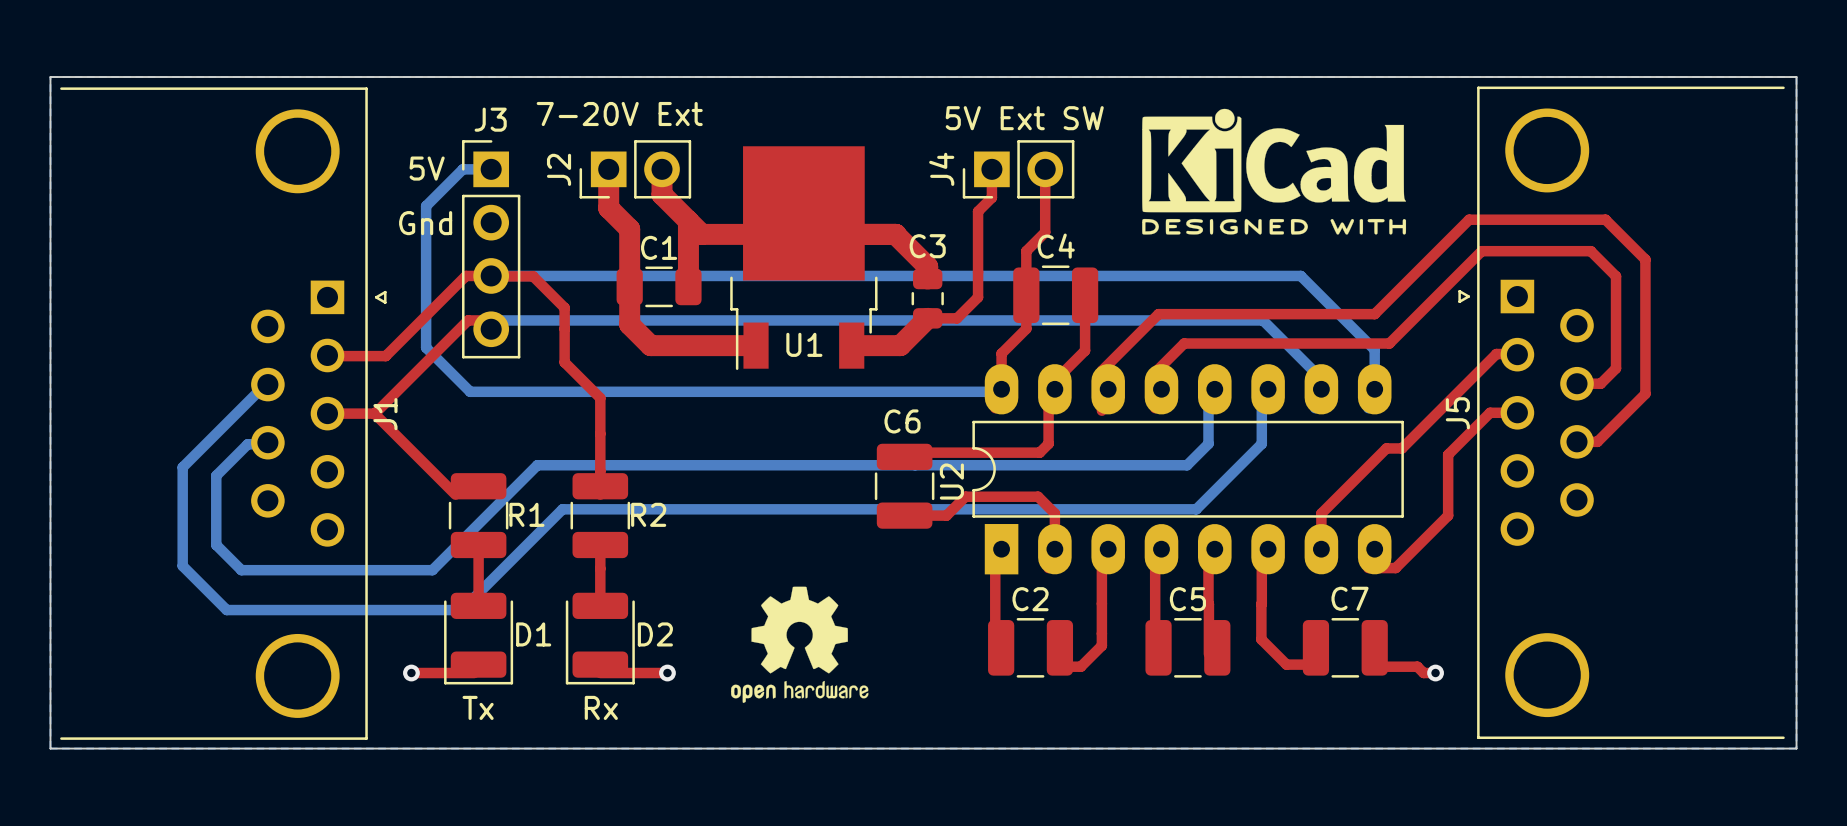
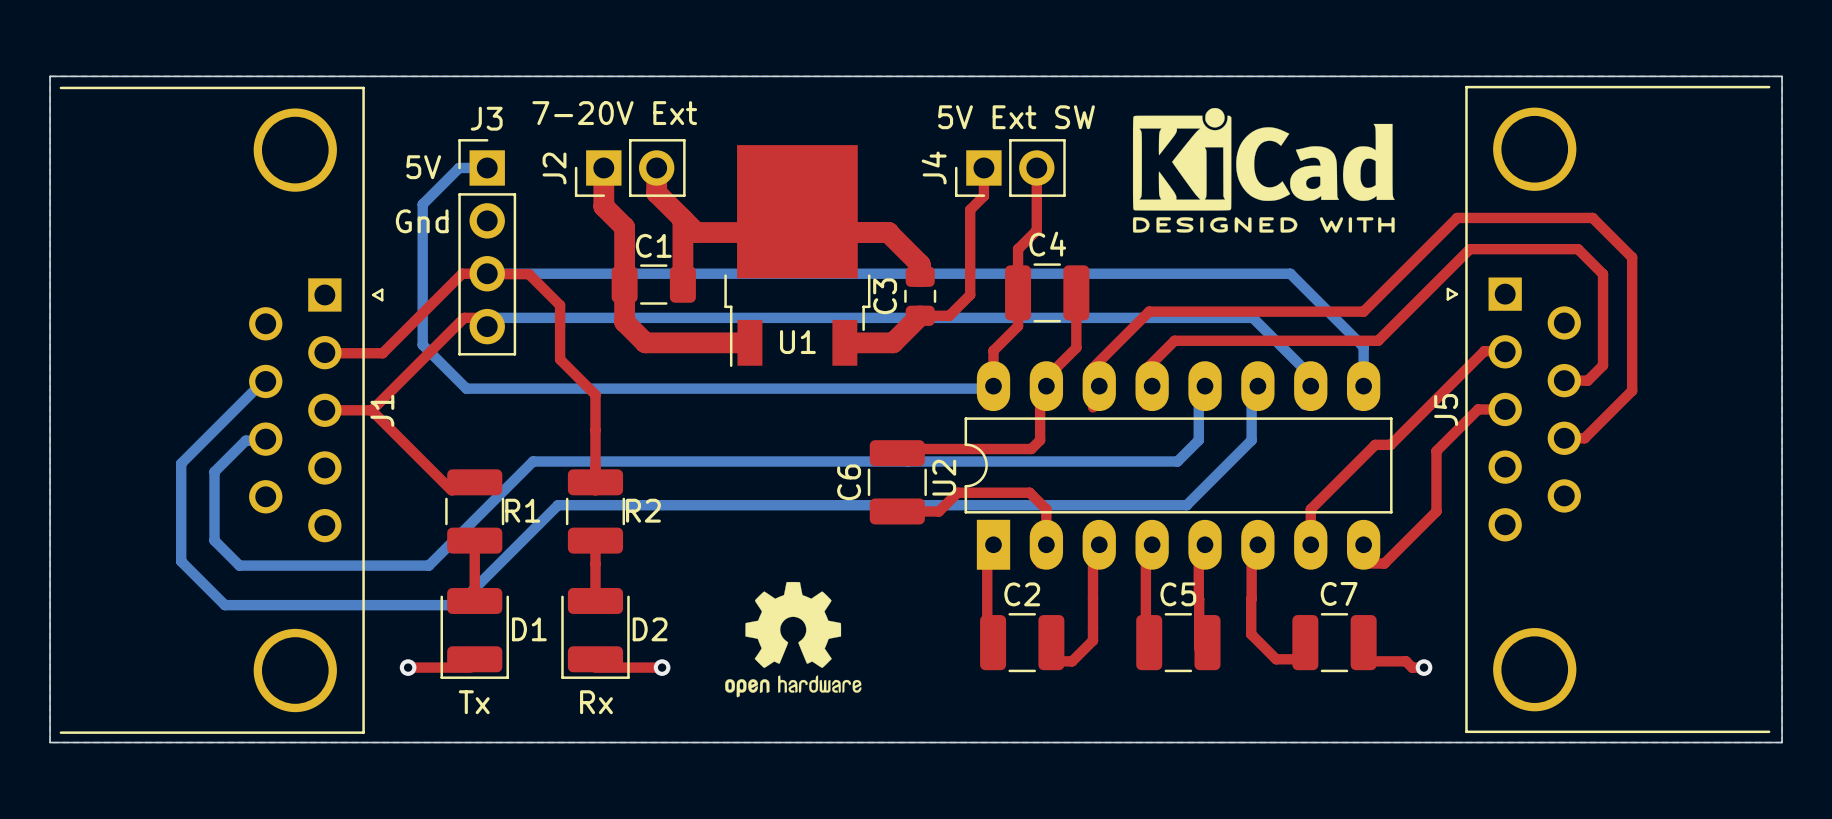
C3 name rotation: 0° (927, 246) -> 90° counterclockwise (885, 296)
C3 name position: C3 (927, 246) -> C3 (885, 296)
C6 name rotation: 0° (902, 421) -> 90° counterclockwise (849, 482)
C6 name position: C6 (902, 421) -> C6 (849, 482)

